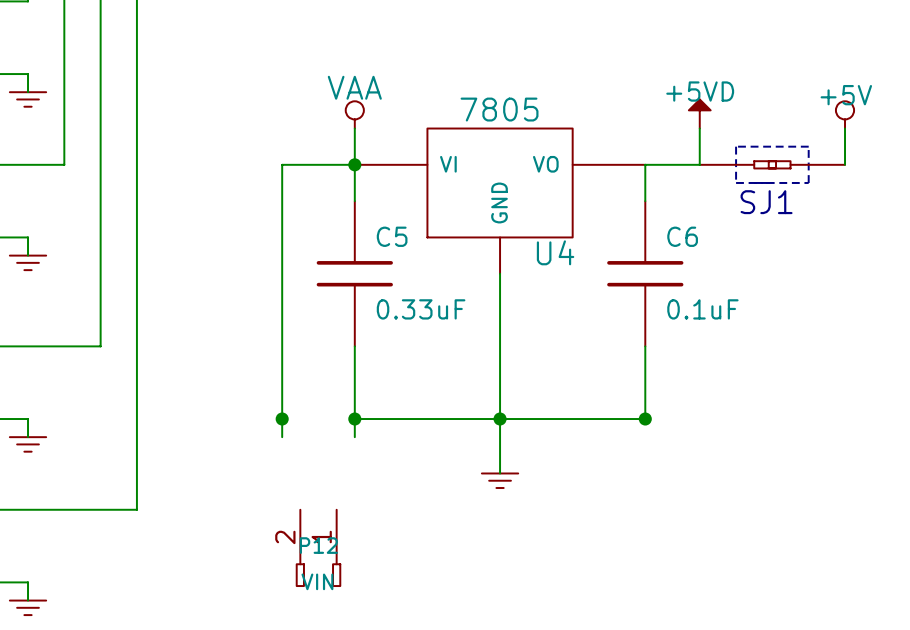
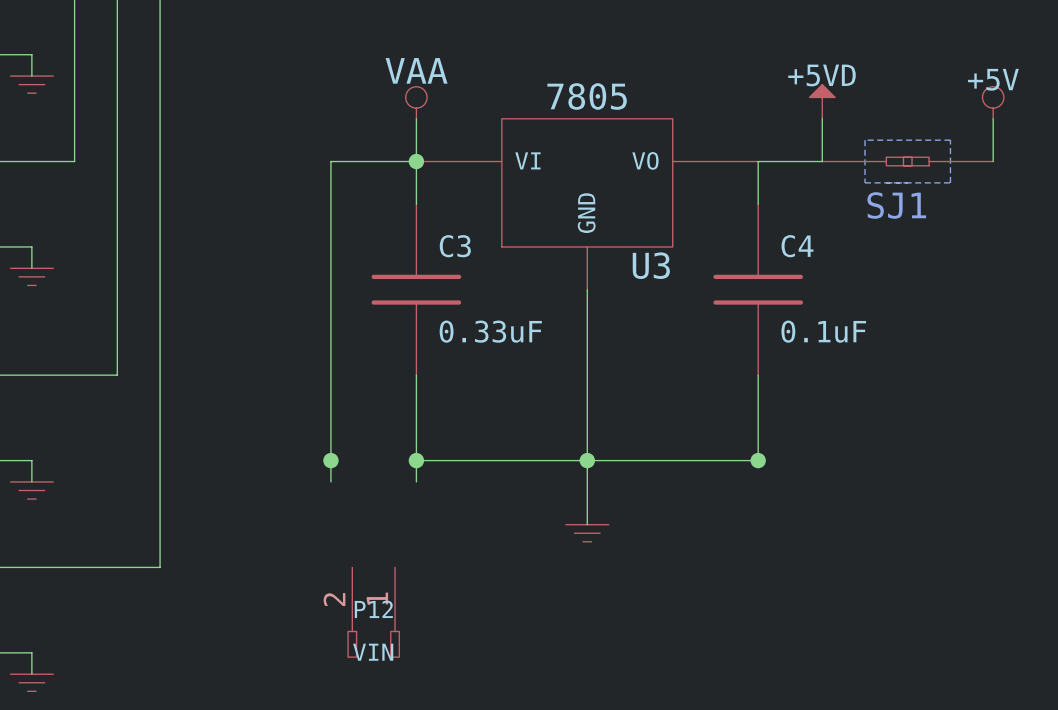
C5 name: C5 (392, 236) -> C3 (455, 246)
C6 name: C6 (682, 236) -> C4 (797, 246)
U4 name: U4 (555, 252) -> U3 (651, 265)

